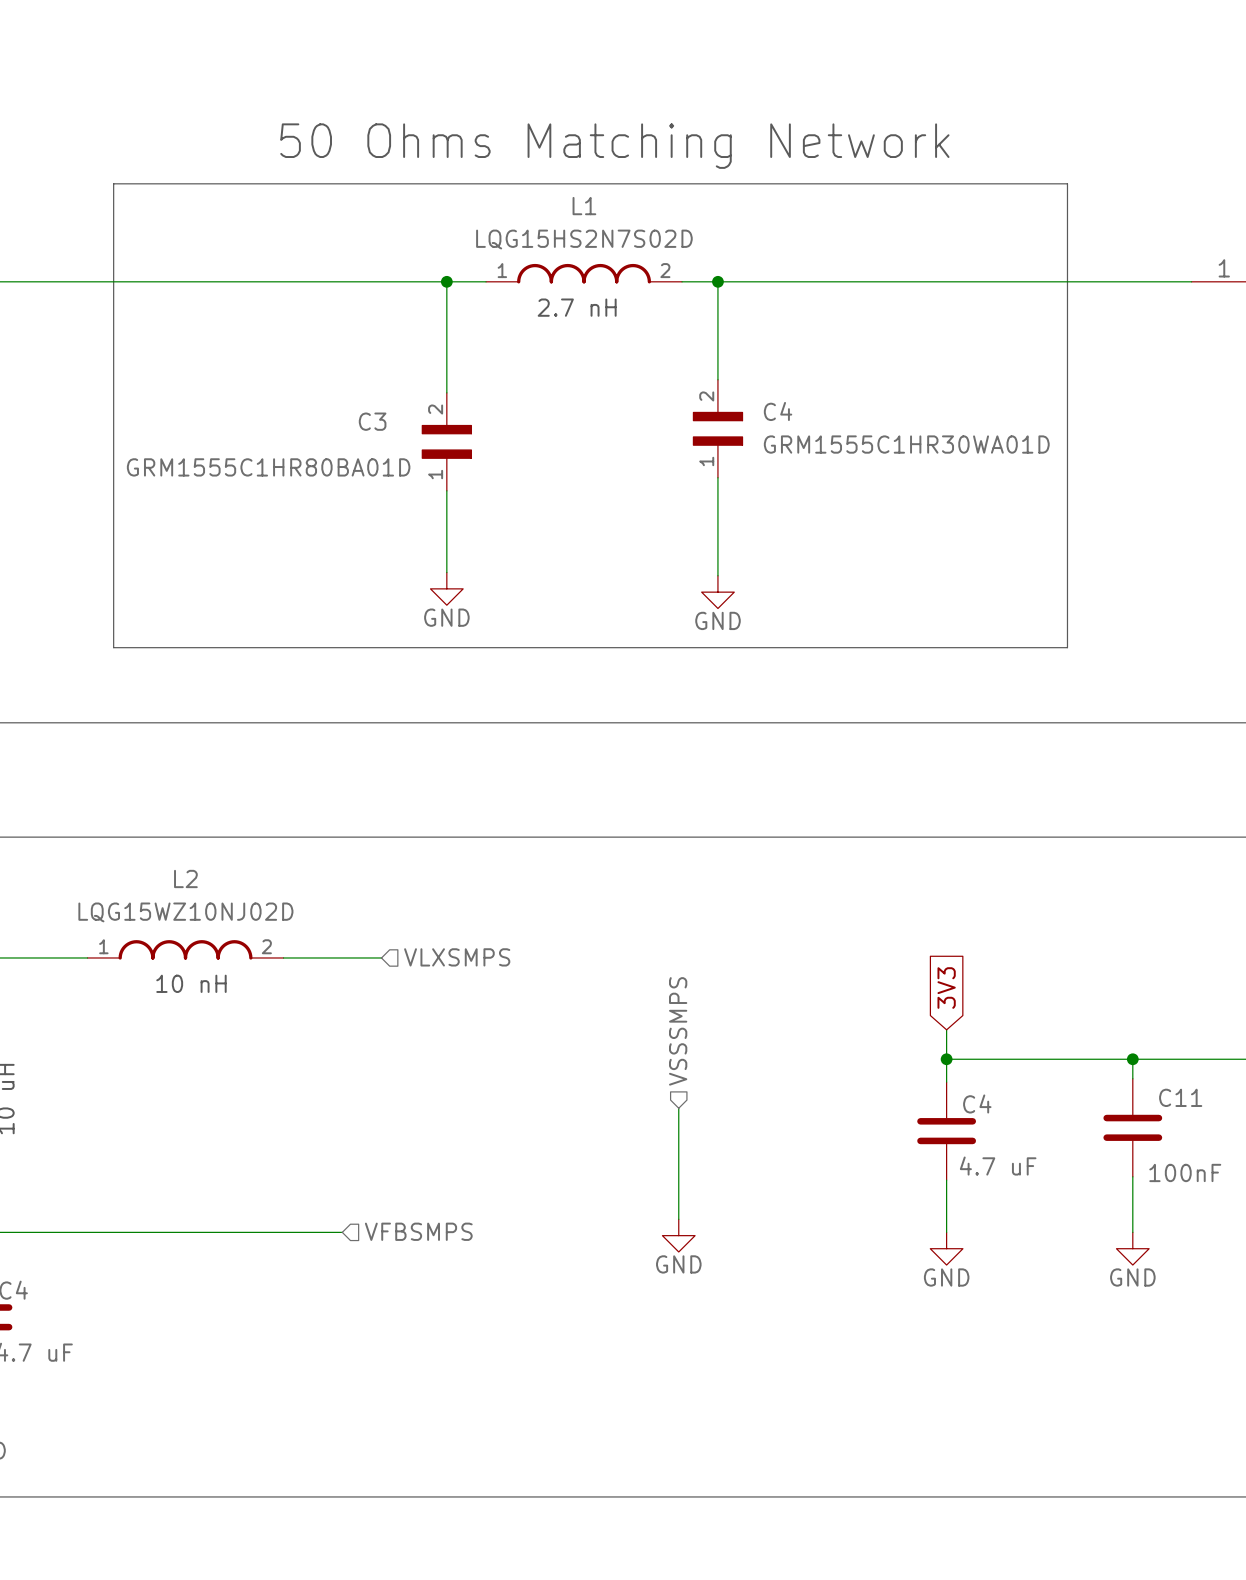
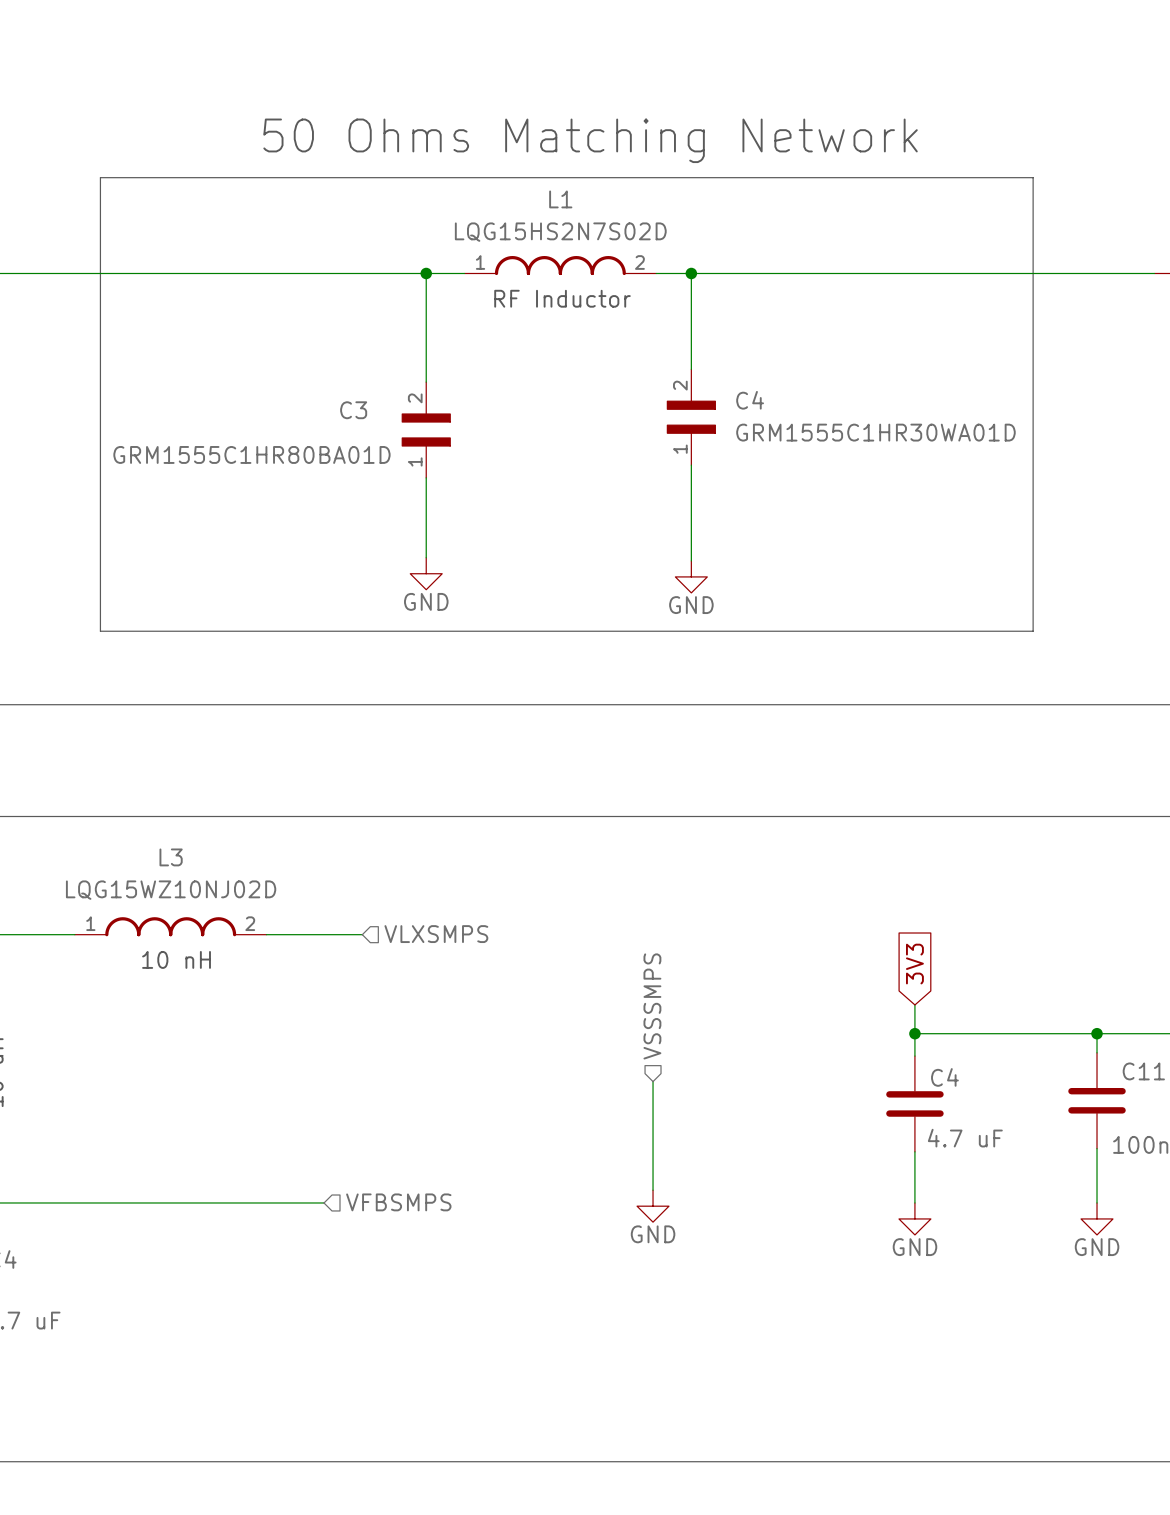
text: 2.7 nH (577, 307) -> none
text: none -> RF Inductor (562, 298)
L2 name: L2 (185, 878) -> L3 (171, 857)

